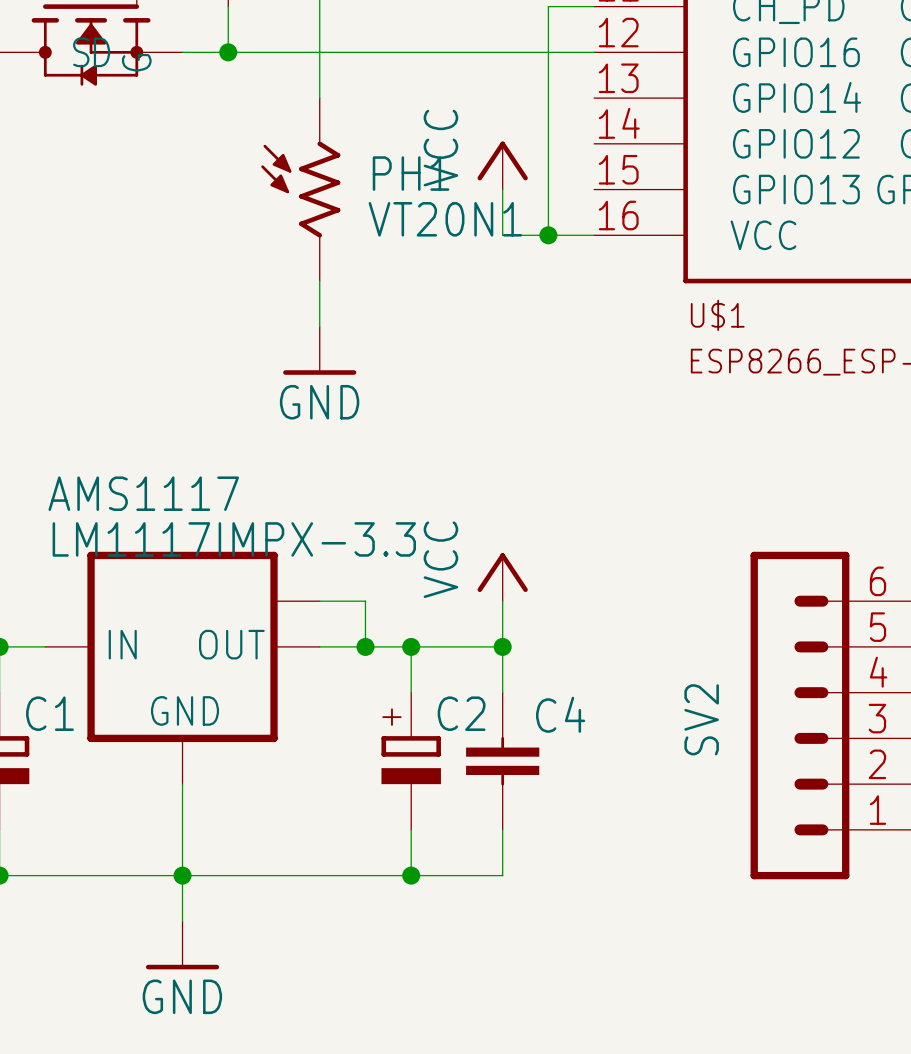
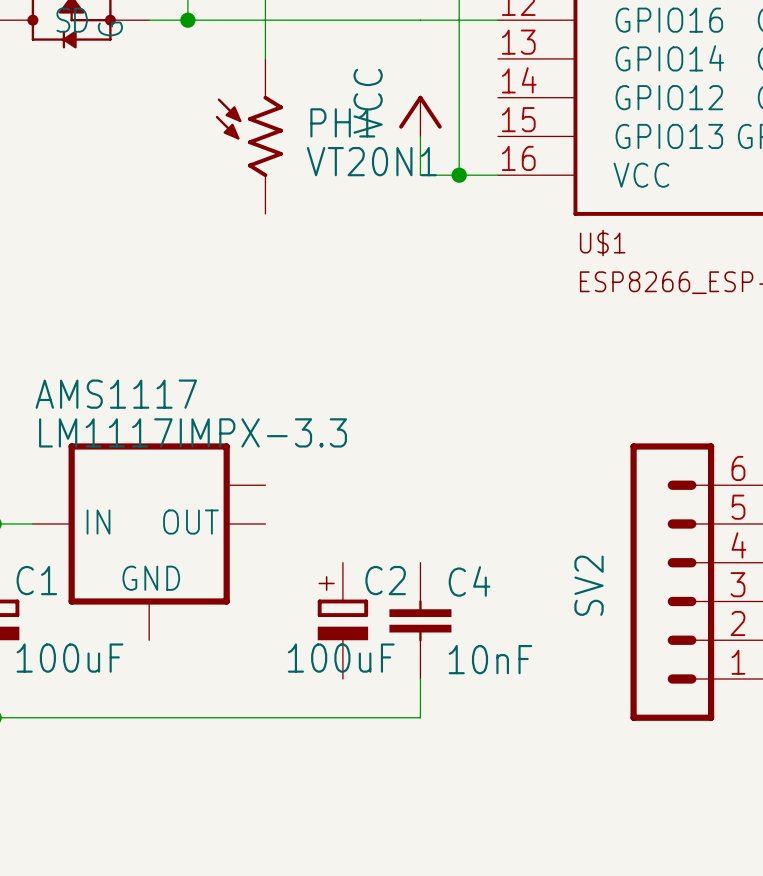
wire: (319, 281) (319, 326) -> none
power symbol: GND (319, 350) -> none
power symbol: VCC (502, 577) -> none
wire: (319, 601) (365, 601) (365, 646) -> none
wire: (502, 601) (502, 692) -> none
wire: (319, 646) (502, 646) -> none
junction: (365, 646) -> none
wire: (411, 646) (411, 692) -> none
junction: (411, 646) -> none
junction: (502, 646) -> none
wire: (182, 784) (182, 921) -> none
C1 value: none -> 100uF (69, 658)
C2 value: none -> 100uF (341, 658)
C4 value: none -> 10nF (490, 659)
wire: (411, 829) (411, 875) -> none
junction: (182, 875) -> none
junction: (411, 875) -> none
power symbol: GND (182, 945) -> none

